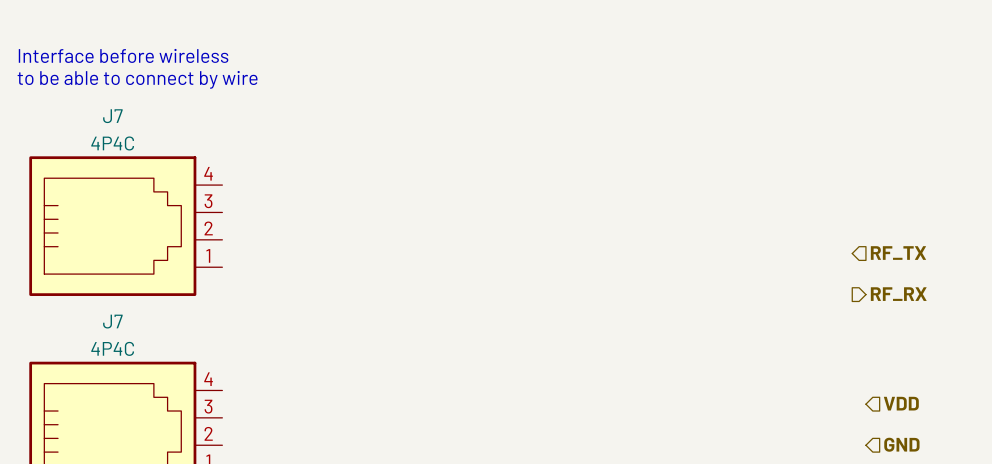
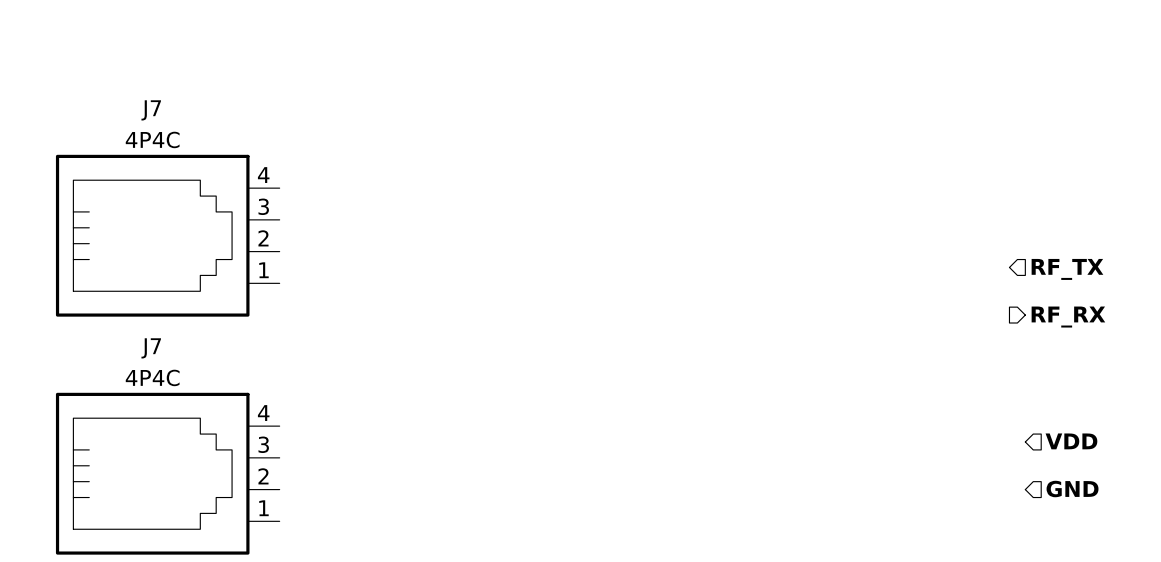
text: Interface before wireless (123, 55) -> none
text: to be able to connect by wire (137, 79) -> none

